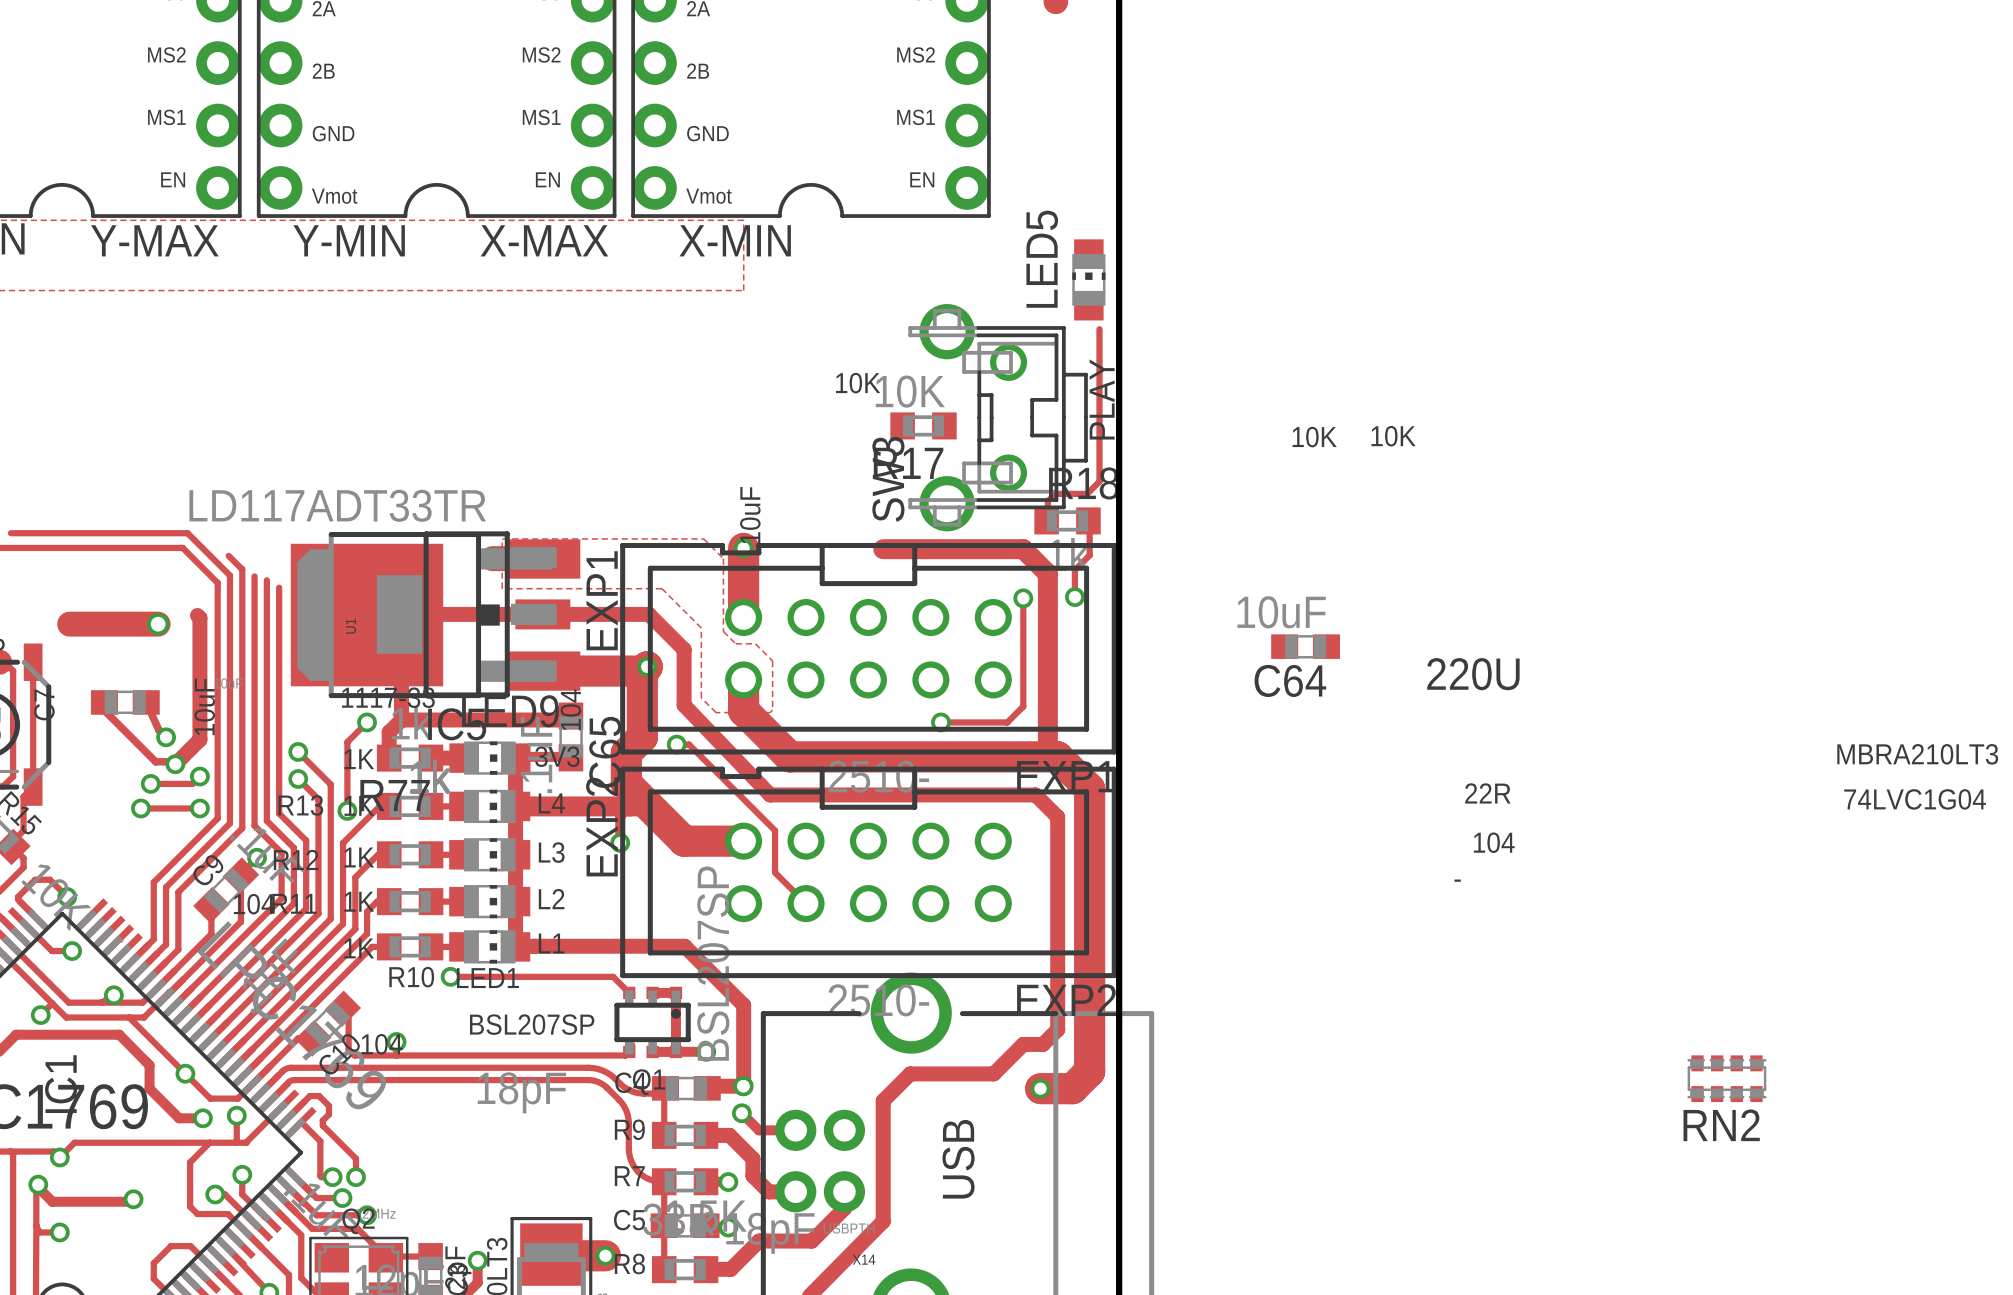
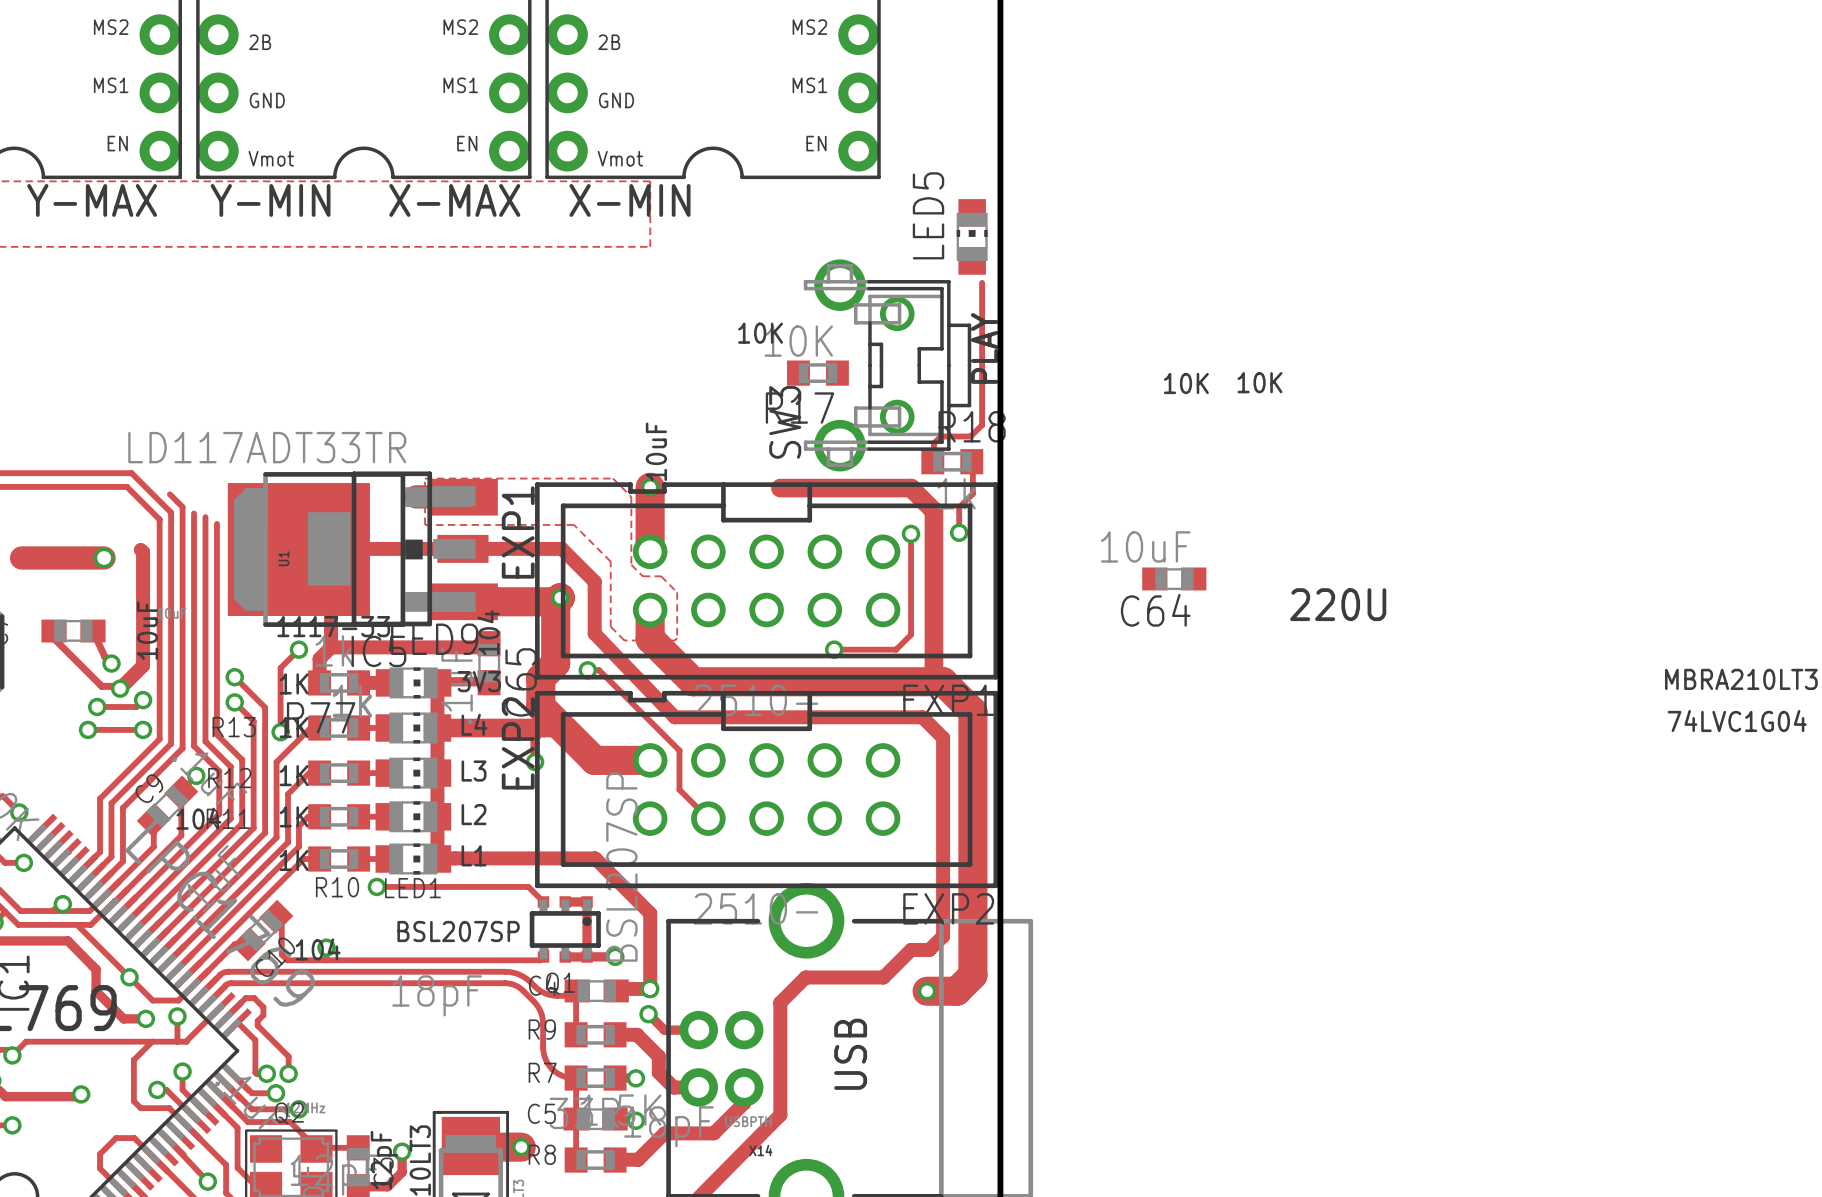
text: 22R (1487, 793) -> none
text: 104 (1494, 842) -> none
text: - (1457, 880) -> none
RN2: (1726, 1078) -> none

